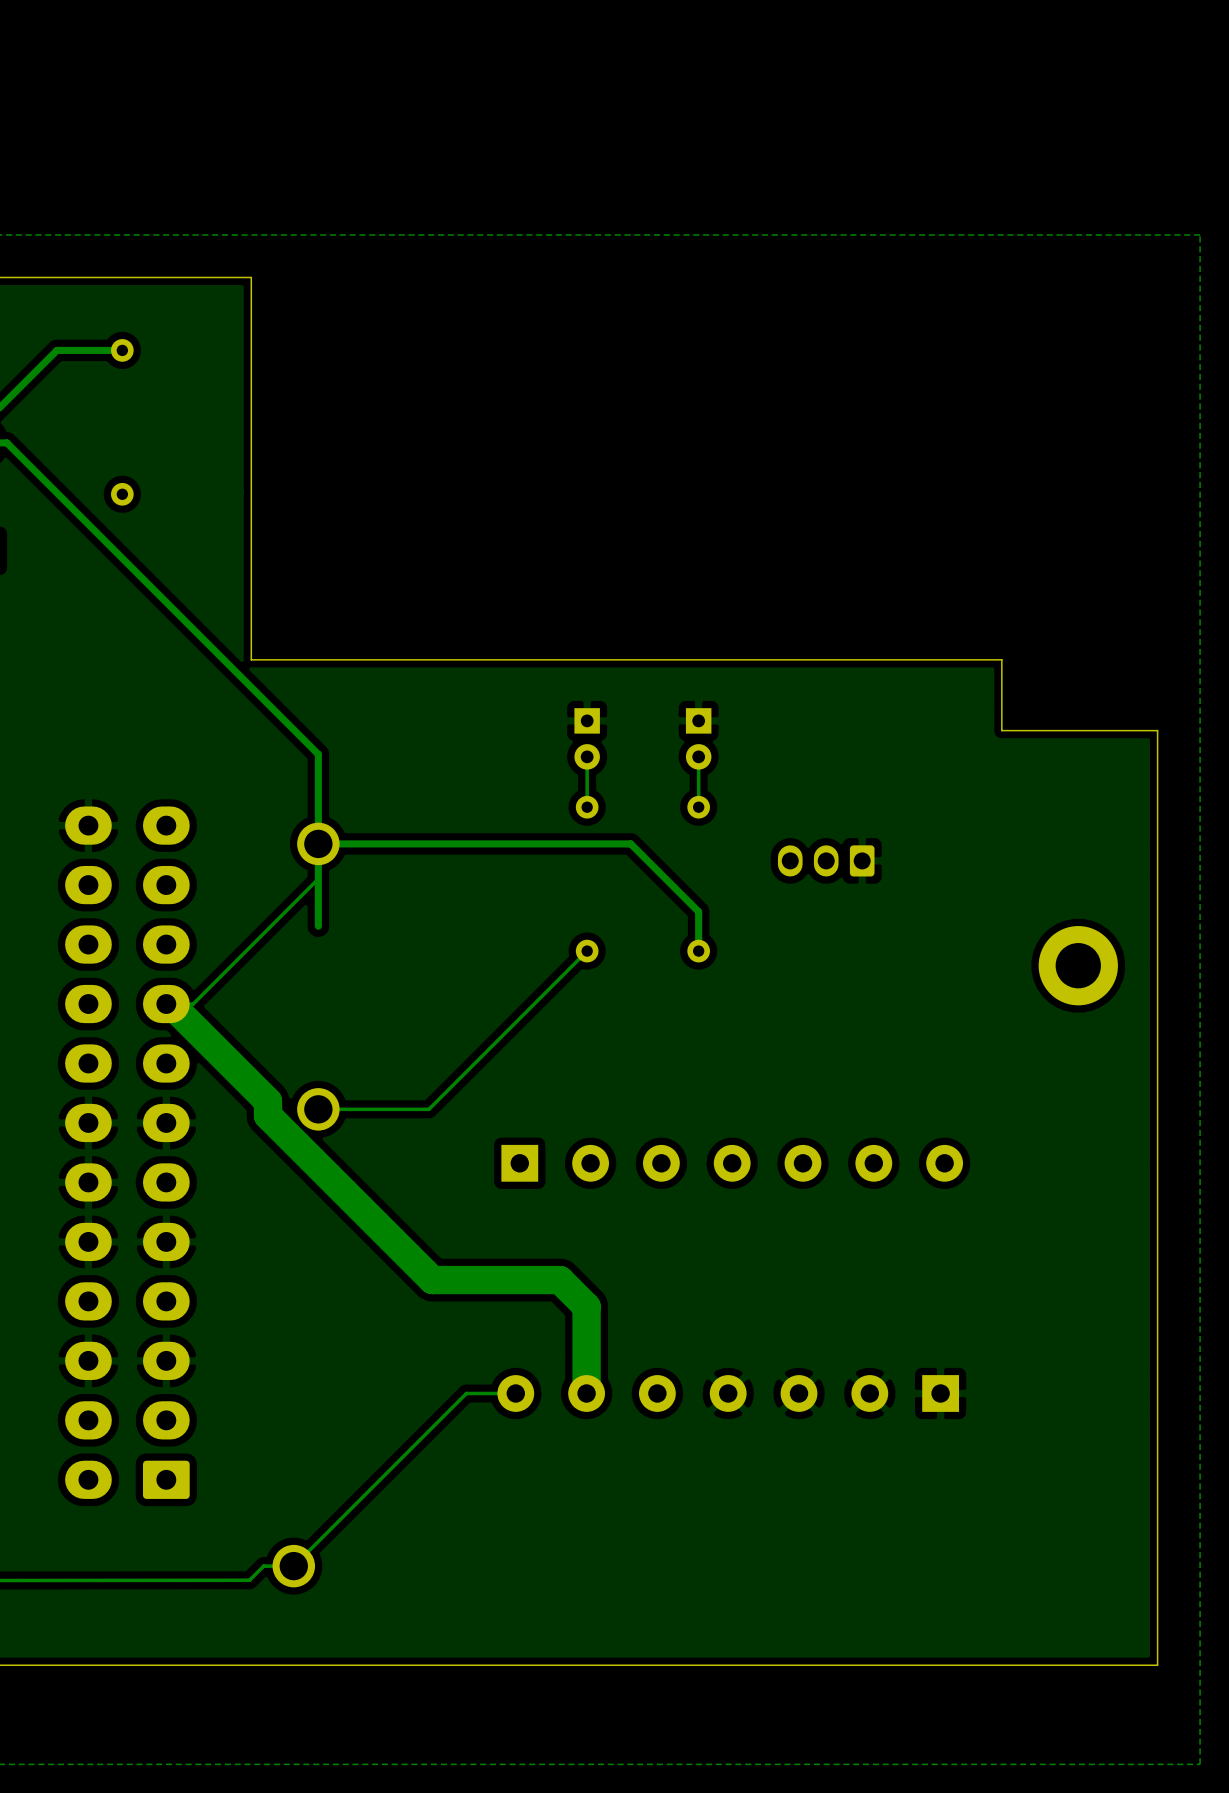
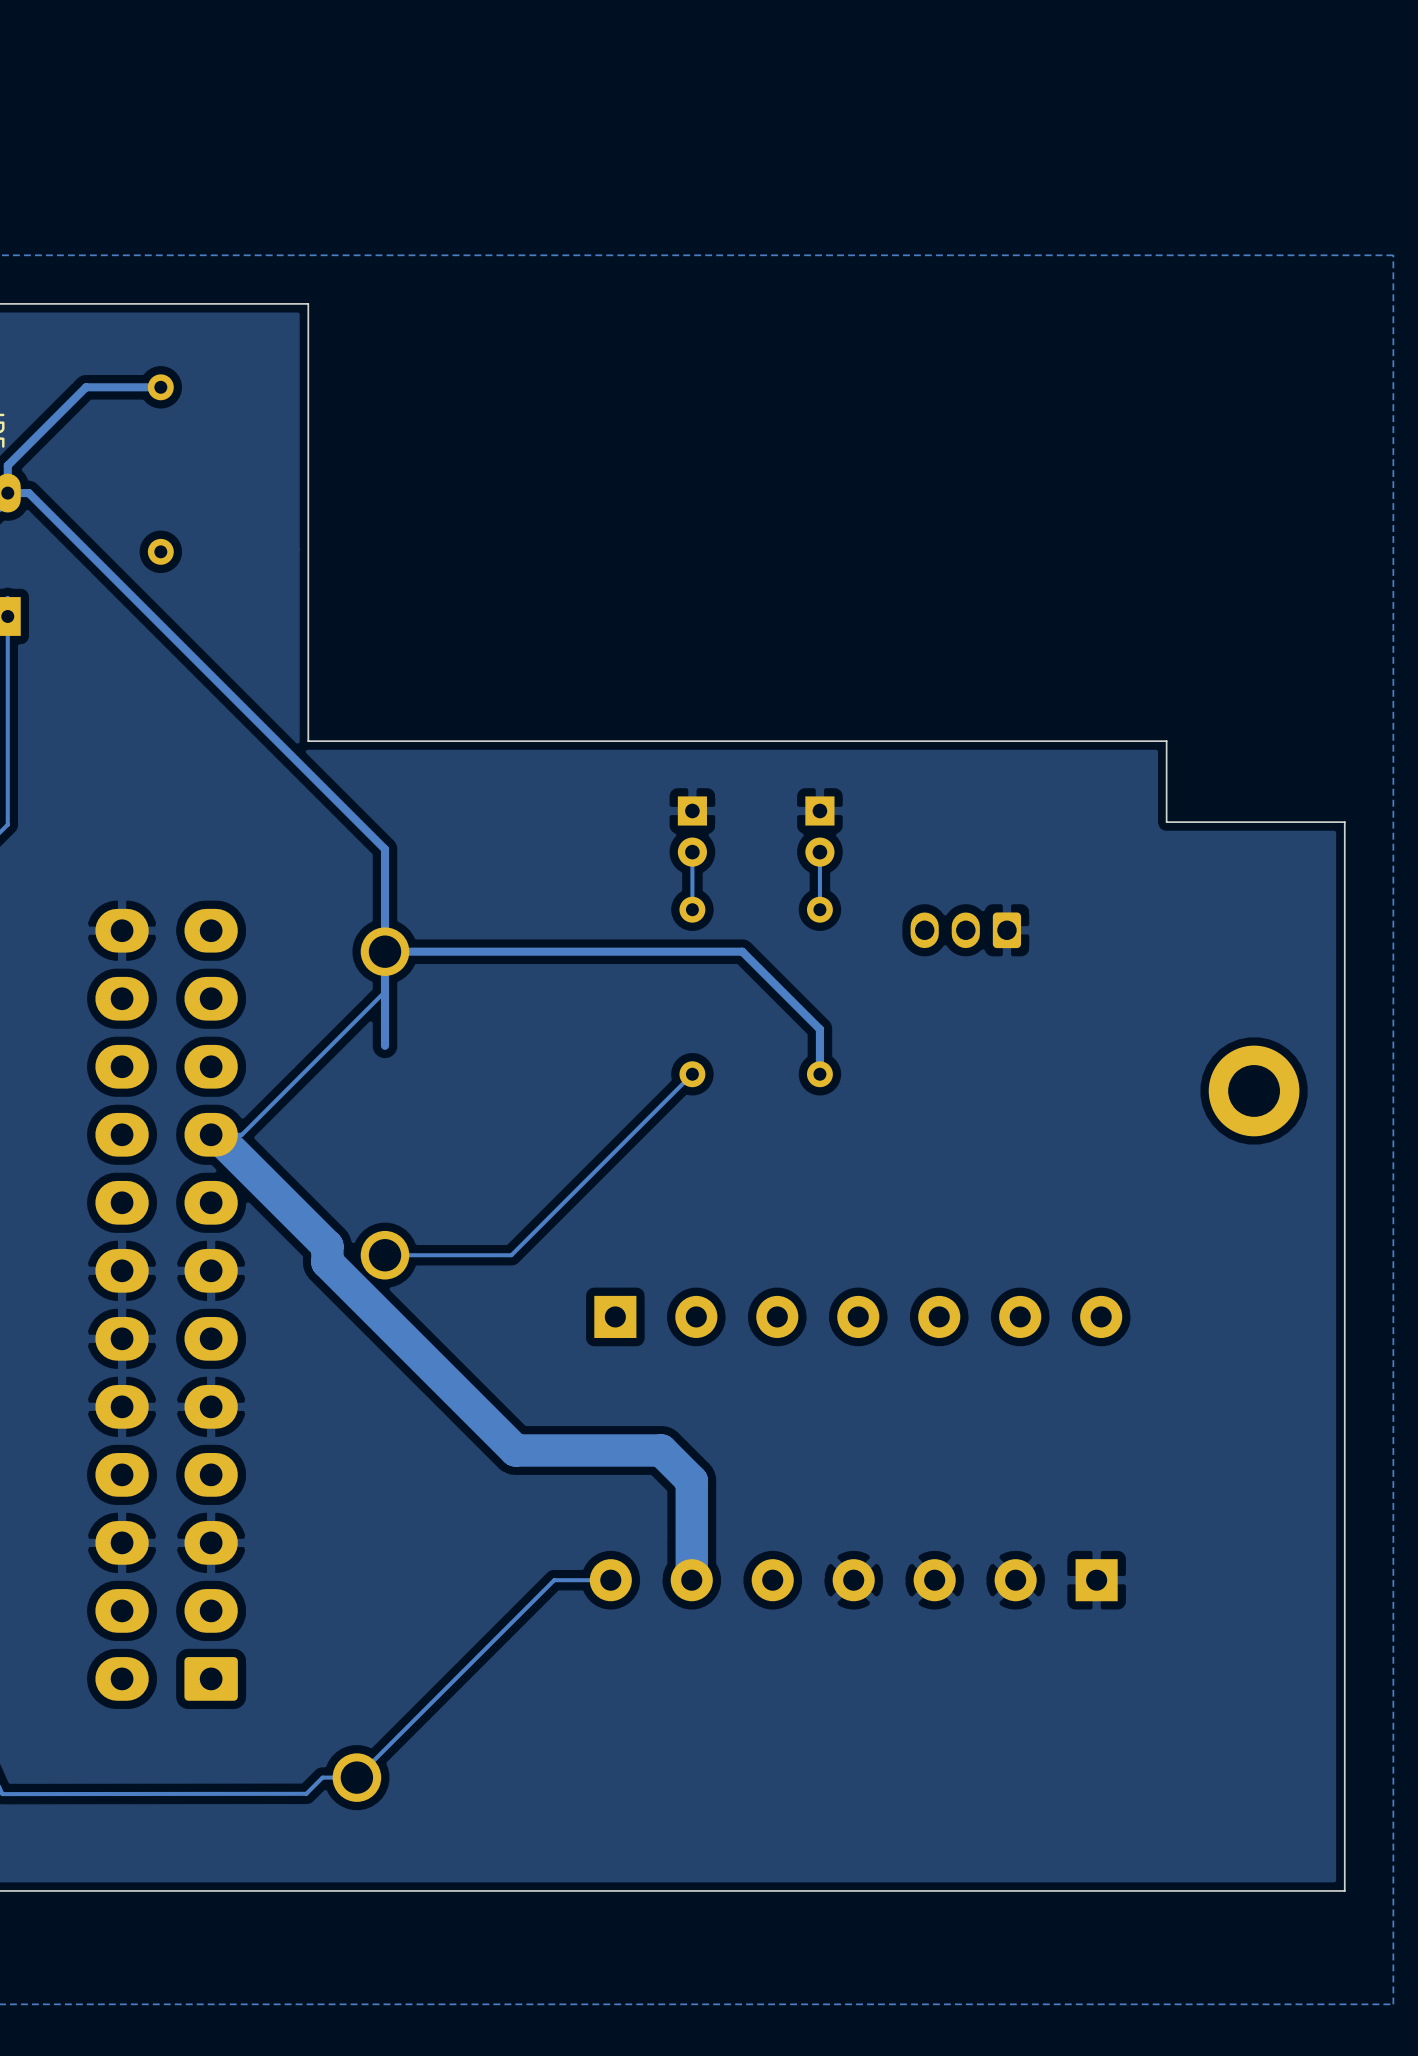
part position: (826, 860) -> (965, 930)

